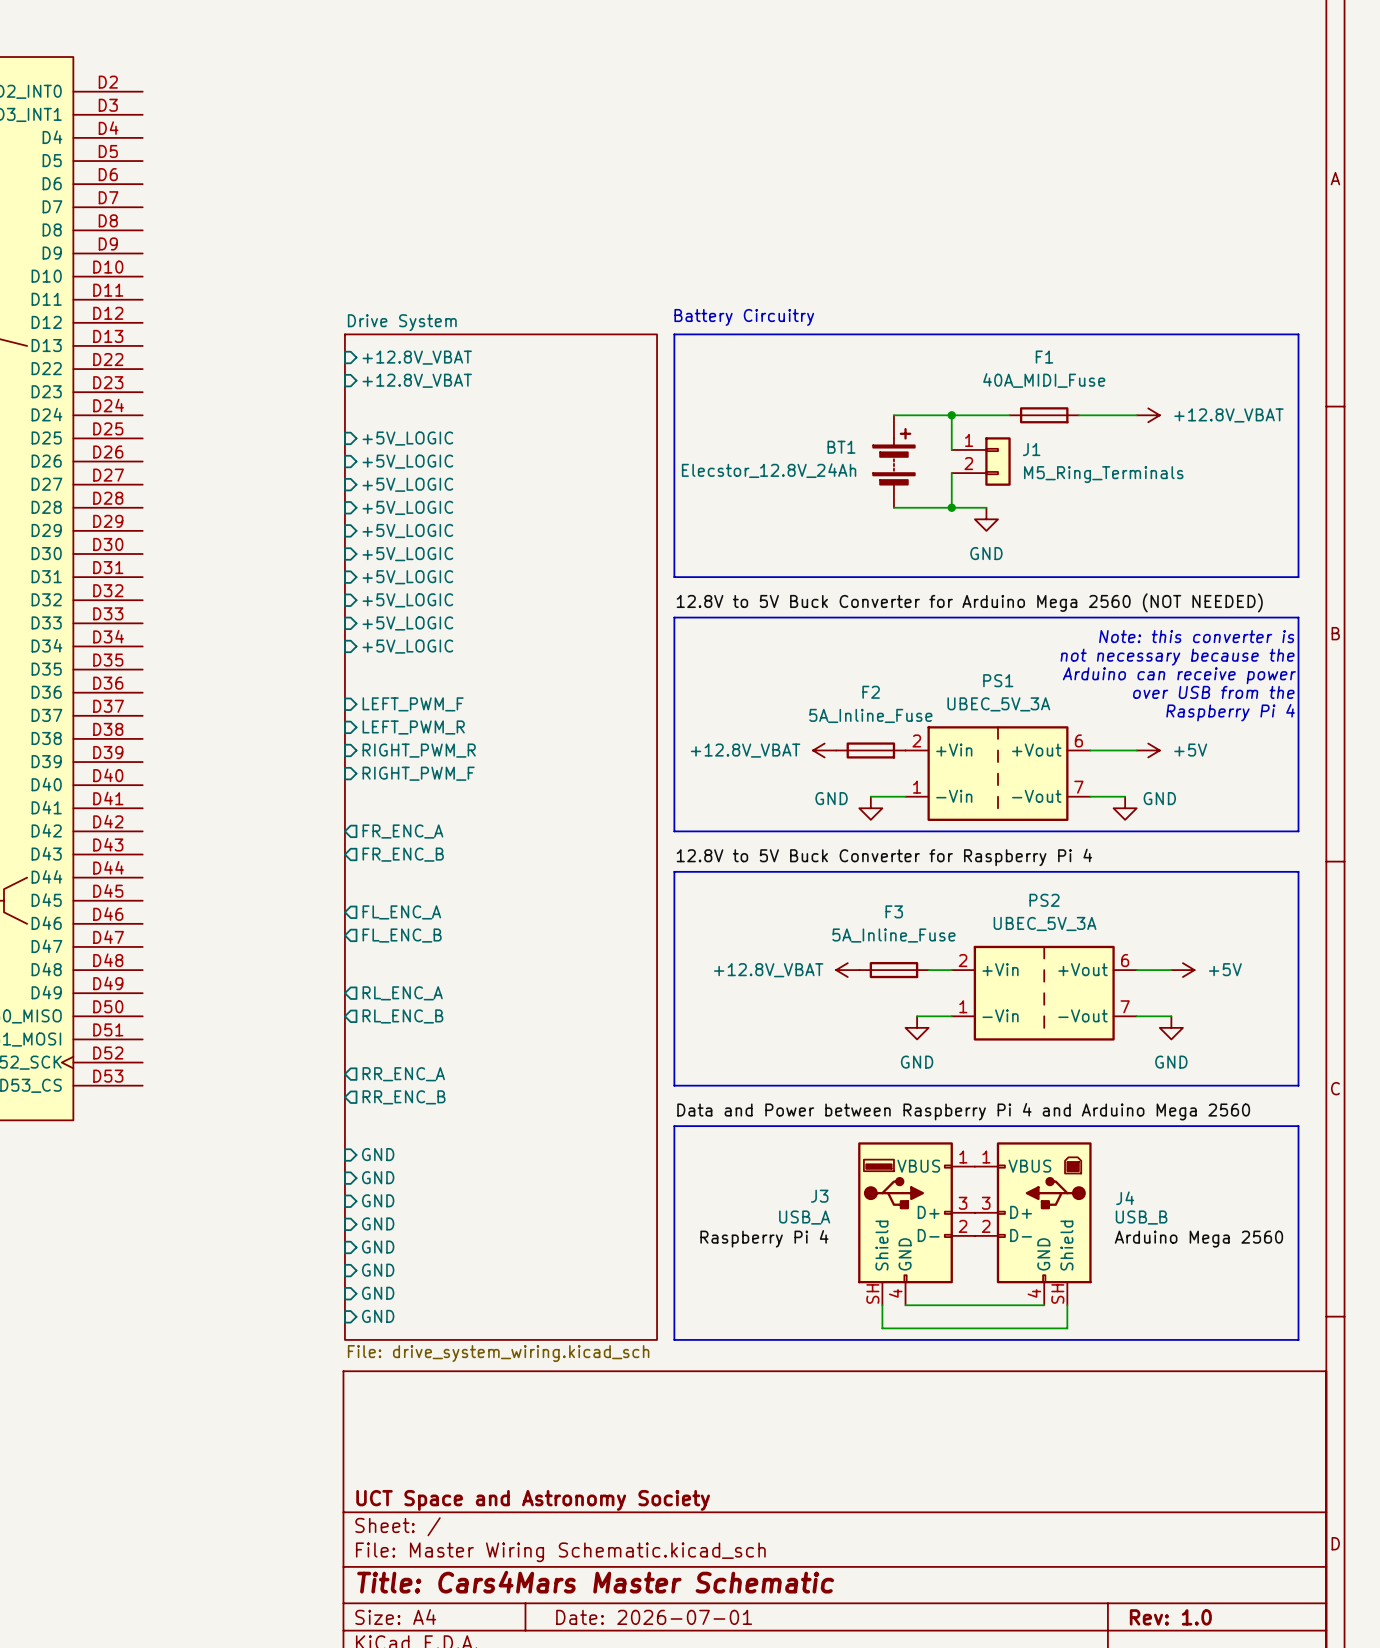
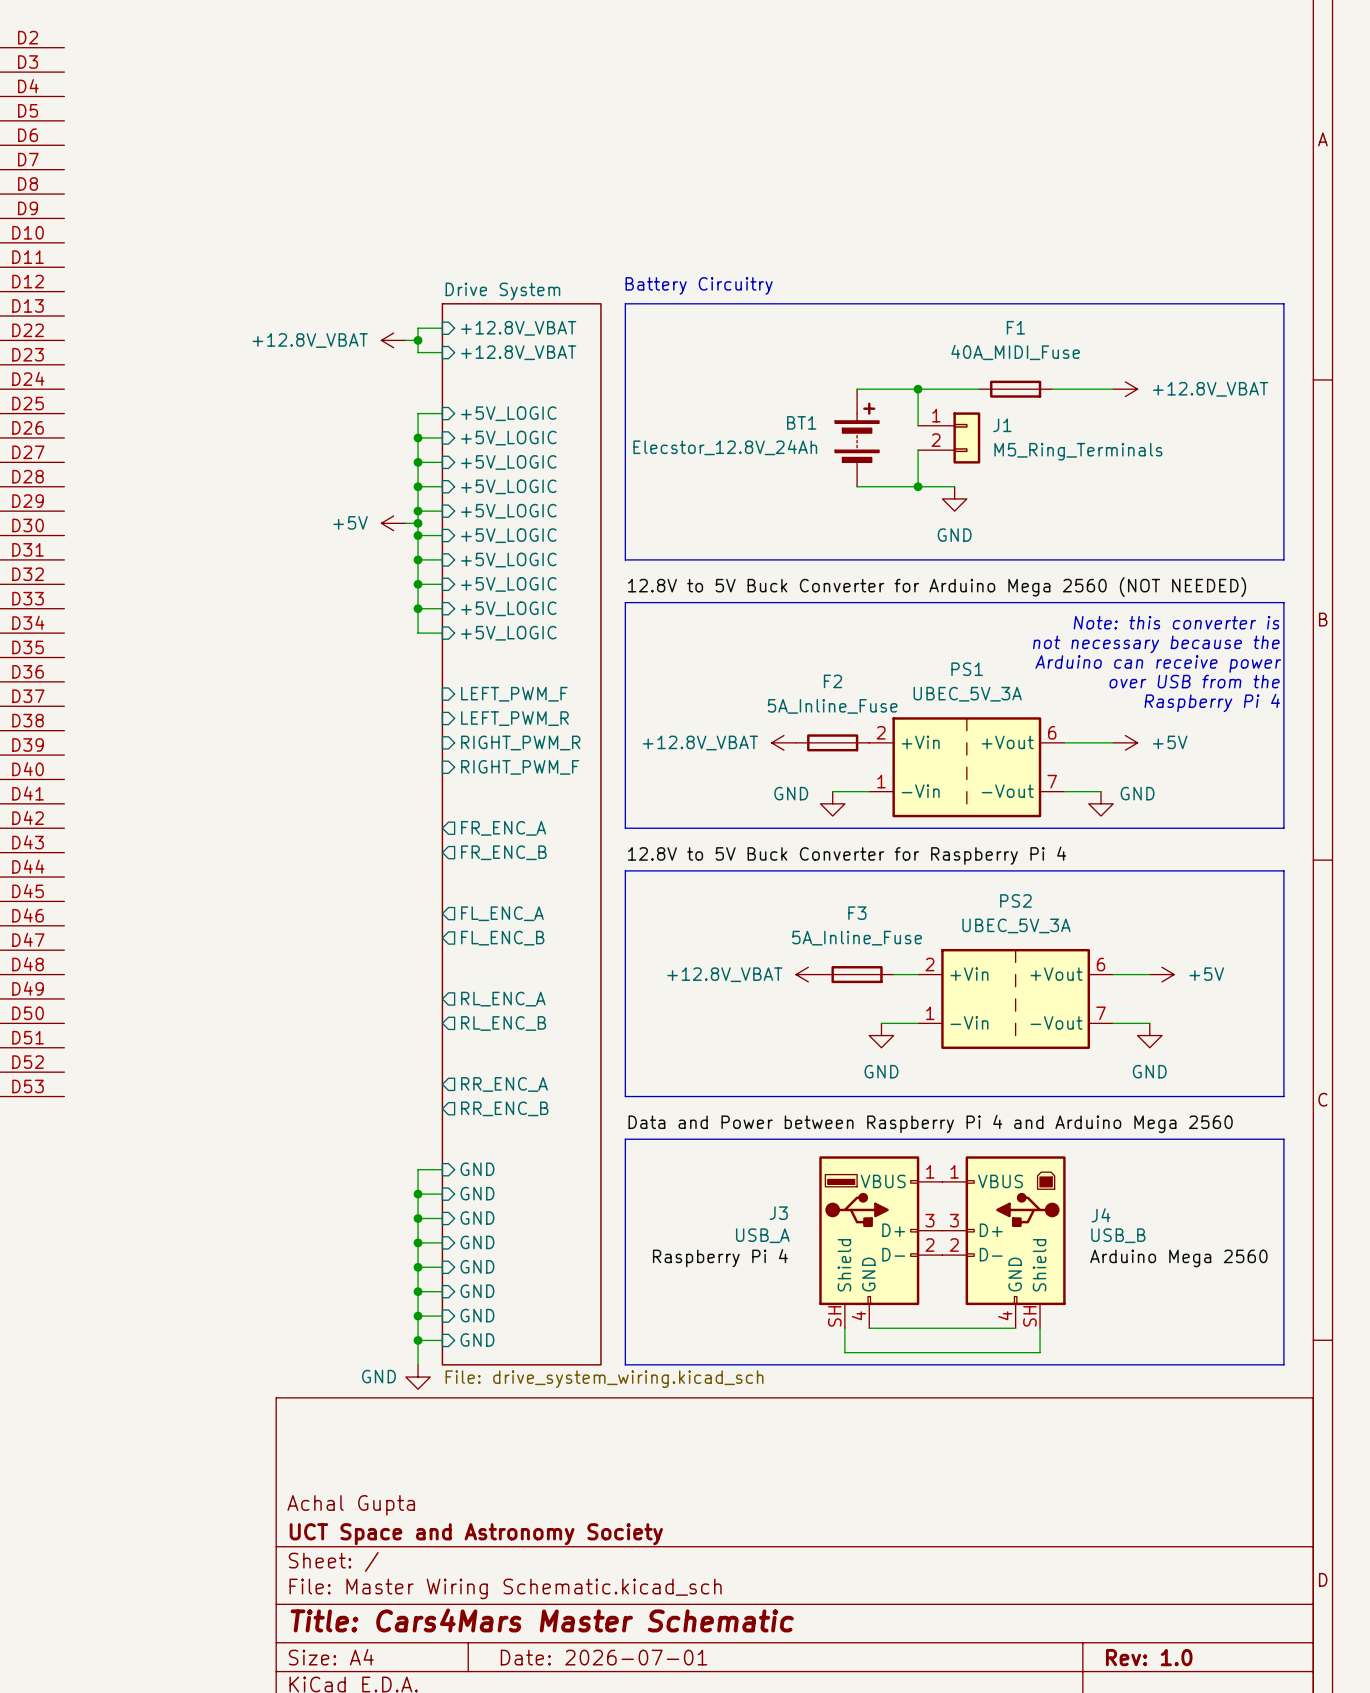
sheet pin: +12.8V_VBAT (417, 357) -> none
wire: none -> (442, 328) (418, 328) (418, 352) (442, 352)
sheet pin: none -> +12.8V_VBAT (518, 328)
power symbol: none -> +12.8V_VBAT (393, 340)
wire: none -> (405, 340) (418, 340)
junction: none -> (418, 340)
sheet pin: +12.8V_VBAT (417, 380) -> none
sheet pin: none -> +12.8V_VBAT (518, 352)
sheet pin: +5V_LOGIC (407, 438) -> none
wire: none -> (442, 413) (418, 413) (418, 633) (442, 633)
sheet pin: none -> +5V_LOGIC (508, 413)
sheet pin: +5V_LOGIC (407, 461) -> none
wire: none -> (418, 437) (442, 437)
junction: none -> (418, 437)
sheet pin: none -> +5V_LOGIC (508, 438)
sheet pin: +5V_LOGIC (407, 484) -> none
wire: none -> (418, 462) (442, 462)
junction: none -> (418, 462)
sheet pin: none -> +5V_LOGIC (508, 462)
sheet pin: +5V_LOGIC (407, 507) -> none
wire: none -> (418, 486) (442, 486)
junction: none -> (418, 486)
sheet pin: none -> +5V_LOGIC (508, 486)
wire: none -> (418, 511) (442, 511)
junction: none -> (418, 511)
sheet pin: +5V_LOGIC (407, 531) -> none
sheet pin: none -> +5V_LOGIC (508, 511)
power symbol: none -> +5V (393, 523)
wire: none -> (405, 523) (418, 523)
junction: none -> (418, 523)
sheet pin: +5V_LOGIC (407, 554) -> none
wire: none -> (418, 535) (442, 535)
junction: none -> (418, 535)
sheet pin: none -> +5V_LOGIC (508, 535)
sheet pin: +5V_LOGIC (407, 577) -> none
wire: none -> (418, 559) (442, 559)
junction: none -> (418, 559)
sheet pin: none -> +5V_LOGIC (508, 560)
sheet pin: +5V_LOGIC (407, 600) -> none
wire: none -> (418, 584) (442, 584)
junction: none -> (418, 584)
sheet pin: none -> +5V_LOGIC (508, 584)
sheet pin: +5V_LOGIC (407, 623) -> none
wire: none -> (418, 608) (442, 608)
junction: none -> (418, 608)
sheet pin: none -> +5V_LOGIC (508, 608)
sheet pin: +5V_LOGIC (407, 646) -> none
sheet pin: none -> +5V_LOGIC (508, 633)
sheet pin position: LEFT_PWM_F (413, 704) -> LEFT_PWM_F (514, 694)
sheet pin position: LEFT_PWM_R (413, 727) -> LEFT_PWM_R (514, 718)
sheet pin position: RIGHT_PWM_R (419, 750) -> RIGHT_PWM_R (520, 742)
sheet pin position: RIGHT_PWM_F (418, 773) -> RIGHT_PWM_F (520, 767)
sheet pin position: FR_ENC_A (402, 831) -> FR_ENC_A (503, 828)
sheet Drive System: File: drive_system_wiring.kicad_sch (501, 837) -> none
sheet Drive System: none -> File: drive_system_wiring.kicad_sch (521, 834)
sheet pin position: FR_ENC_B (403, 854) -> FR_ENC_B (503, 852)
sheet pin position: FL_ENC_A (401, 912) -> FL_ENC_A (502, 913)
sheet pin position: FL_ENC_B (402, 935) -> FL_ENC_B (502, 938)
sheet pin position: RL_ENC_A (402, 993) -> RL_ENC_A (503, 999)
sheet pin position: RL_ENC_B (402, 1016) -> RL_ENC_B (503, 1023)
sheet pin position: RR_ENC_A (403, 1074) -> RR_ENC_A (504, 1084)
sheet pin position: RR_ENC_B (404, 1097) -> RR_ENC_B (504, 1108)
sheet pin: GND (378, 1154) -> none
sheet pin: none -> GND (477, 1169)
wire: none -> (442, 1169) (418, 1169) (418, 1364)
sheet pin: GND (378, 1177) -> none
sheet pin: none -> GND (477, 1193)
wire: none -> (418, 1194) (442, 1194)
junction: none -> (418, 1194)
sheet pin: GND (378, 1200) -> none
sheet pin: none -> GND (477, 1218)
wire: none -> (418, 1218) (442, 1218)
junction: none -> (418, 1218)
sheet pin: GND (378, 1223) -> none
sheet pin: none -> GND (477, 1242)
wire: none -> (418, 1242) (442, 1242)
junction: none -> (418, 1242)
sheet pin: GND (378, 1247) -> none
wire: none -> (418, 1267) (442, 1267)
junction: none -> (418, 1267)
sheet pin: none -> GND (477, 1266)
sheet pin: GND (378, 1270) -> none
wire: none -> (418, 1291) (442, 1291)
junction: none -> (418, 1291)
sheet pin: none -> GND (477, 1291)
sheet pin: GND (378, 1293) -> none
wire: none -> (418, 1316) (442, 1316)
junction: none -> (418, 1316)
sheet pin: none -> GND (477, 1315)
sheet pin: GND (378, 1316) -> none
wire: none -> (418, 1340) (442, 1340)
junction: none -> (418, 1340)
sheet pin: none -> GND (477, 1340)
power symbol: none -> GND (418, 1377)
title block: none -> Achal Gupta (351, 1505)

